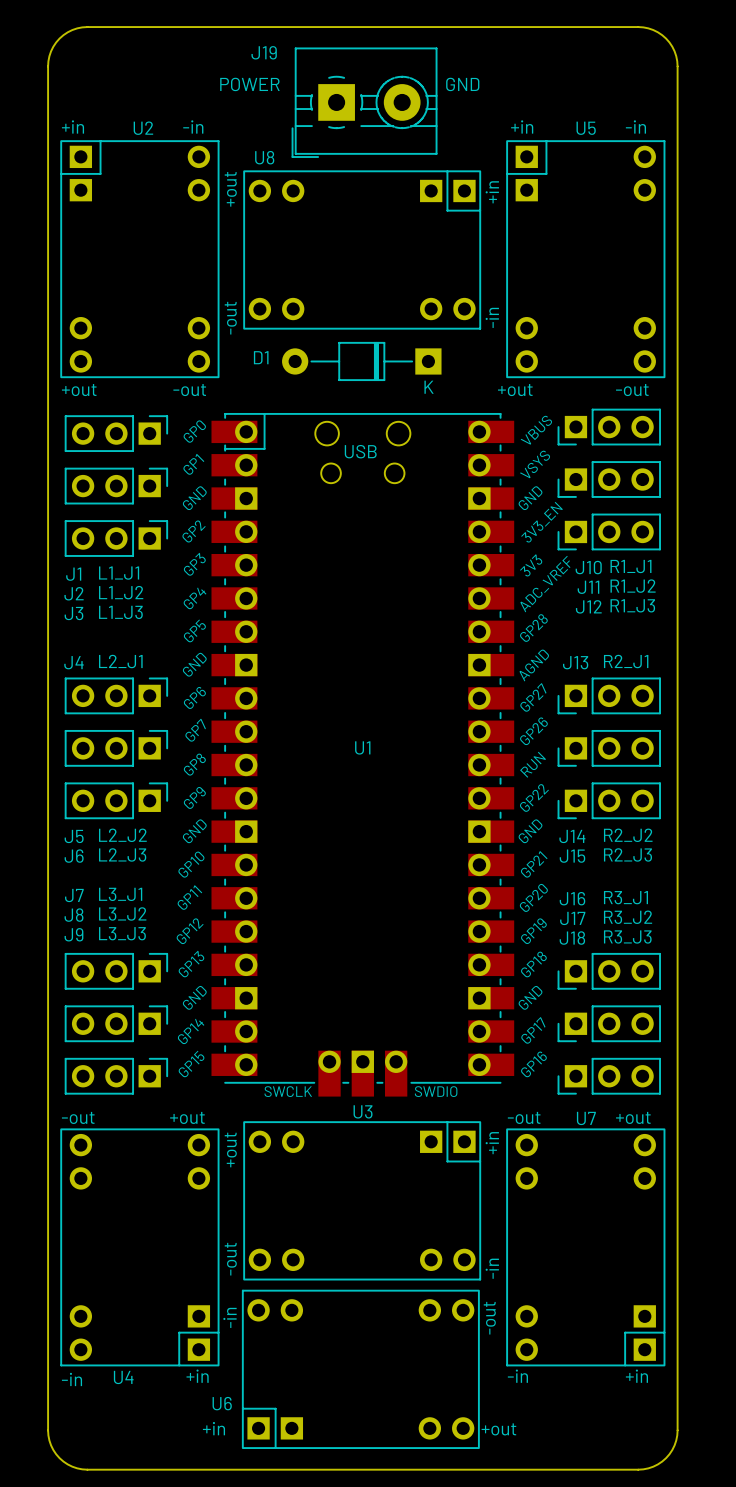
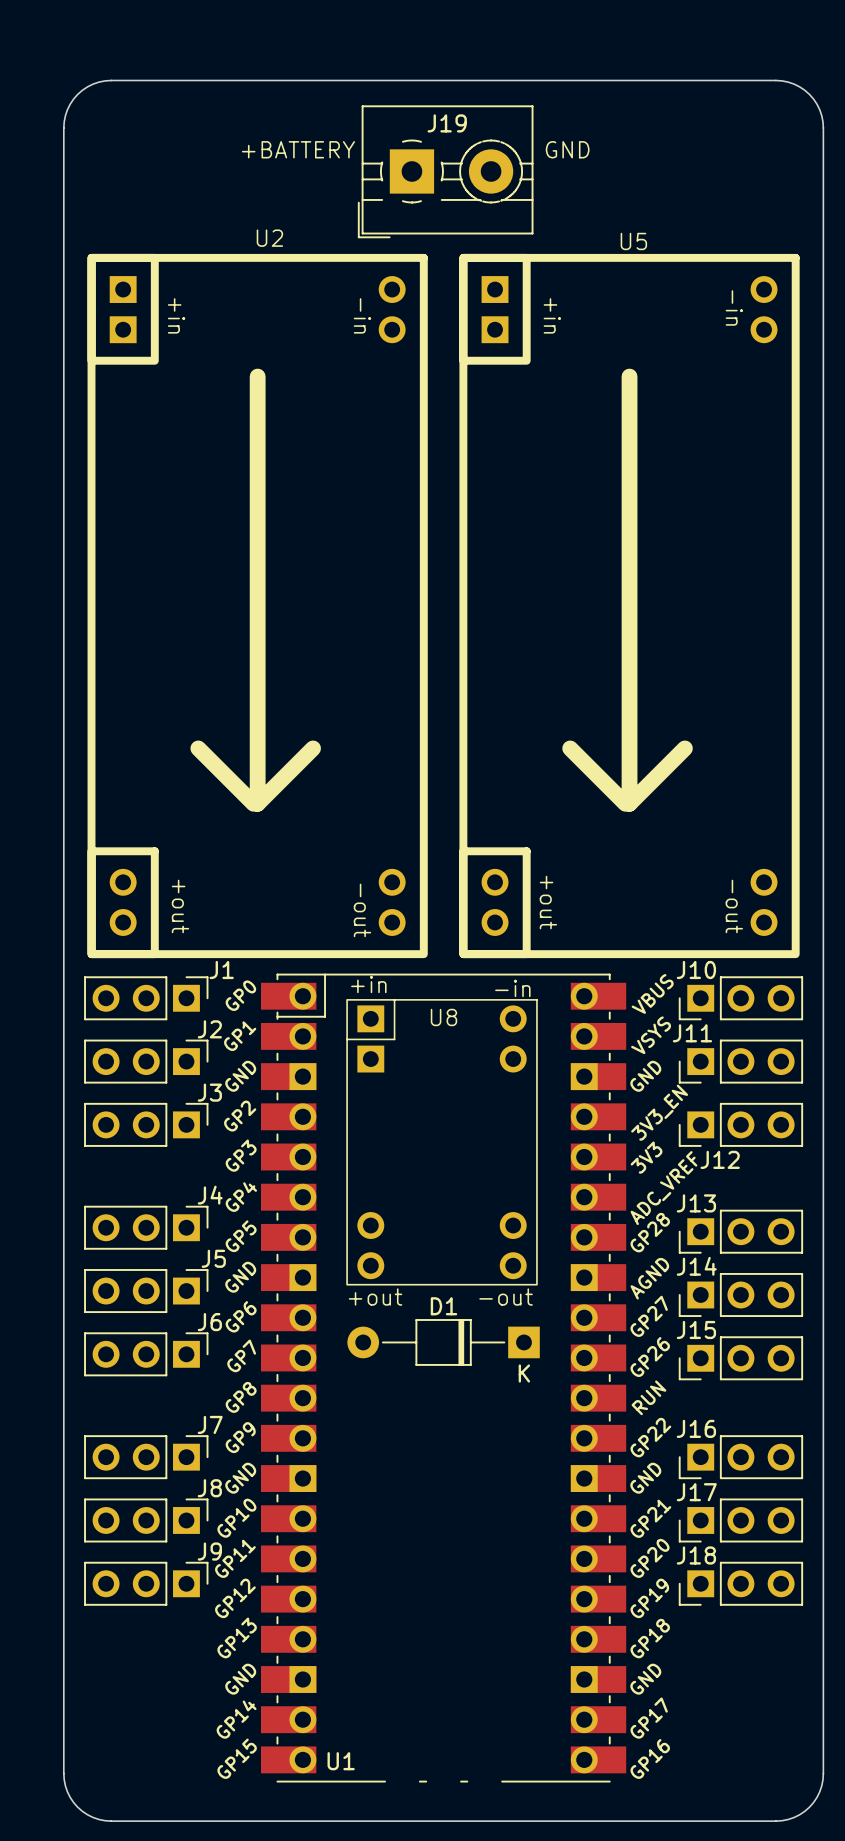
J19 name position: J19 (264, 52) -> J19 (447, 123)
text: none -> +BATTERY (298, 149)
text: POWER (249, 84) -> none
U2 name position: U2 (143, 128) -> U2 (269, 238)
U5 name position: U5 (586, 128) -> U5 (633, 241)
U2 footprint: [60, 140, 220, 378] -> [87, 253, 428, 959]
U5 footprint: [506, 140, 666, 378] -> [459, 253, 800, 959]
U8 name position: U8 (264, 157) -> U8 (443, 1017)
U8 footprint: [243, 170, 481, 330] -> [346, 999, 538, 1286]
D1 name position: D1 (261, 357) -> D1 (443, 1306)
D1 position: (361, 361) -> (443, 1342)
U1 footprint: [211, 413, 515, 1097] -> [260, 973, 627, 1783]
J10 position: (609, 427) -> (740, 998)
J1 position: (116, 433) -> (146, 998)
text: USB (360, 451) -> none
J11 position: (609, 479) -> (740, 1061)
J2 position: (116, 486) -> (146, 1061)
J12 position: (609, 531) -> (740, 1124)
J3 position: (116, 538) -> (146, 1124)
text: R1_J1 (630, 566) -> none
J10 name position: J10 (588, 567) -> J10 (696, 970)
text: L1_J1 (119, 573) -> none
J1 name position: J1 (73, 574) -> J1 (221, 970)
text: R1_J2 (633, 586) -> none
J11 name position: J11 (588, 587) -> J11 (692, 1033)
text: L1_J2 (121, 592) -> none
J2 name position: J2 (74, 593) -> J2 (209, 1029)
text: R1_J3 (632, 605) -> none
J12 name position: J12 (588, 606) -> J12 (720, 1159)
text: L1_J3 (120, 612) -> none
J3 name position: J3 (73, 613) -> J3 (209, 1092)
text: L2_J1 (120, 661) -> none
text: R2_J1 (626, 661) -> none
J4 name position: J4 (74, 662) -> J4 (210, 1195)
J13 name position: J13 (575, 662) -> J13 (696, 1203)
J4 position: (116, 695) -> (146, 1227)
J13 position: (609, 695) -> (740, 1231)
U1 name position: U1 (362, 747) -> U1 (341, 1761)
J5 position: (116, 748) -> (146, 1291)
J14 position: (609, 748) -> (740, 1294)
J6 position: (116, 800) -> (146, 1354)
J15 position: (609, 800) -> (740, 1358)
text: L2_J2 (122, 835) -> none
text: R2_J2 (628, 835) -> none
J5 name position: J5 (74, 836) -> J5 (213, 1258)
J14 name position: J14 (572, 836) -> J14 (696, 1266)
text: L2_J3 (122, 854) -> none
text: R2_J3 (627, 854) -> none
J6 name position: J6 (74, 856) -> J6 (209, 1322)
J15 name position: J15 (572, 856) -> J15 (696, 1330)
text: L3_J1 (120, 894) -> none
J7 name position: J7 (74, 895) -> J7 (210, 1424)
text: R3_J1 (625, 897) -> none
J16 name position: J16 (572, 898) -> J16 (696, 1428)
text: L3_J2 (122, 913) -> none
J8 name position: J8 (74, 915) -> J8 (209, 1488)
text: R3_J2 (628, 917) -> none
J17 name position: J17 (572, 918) -> J17 (696, 1492)
text: L3_J3 (122, 933) -> none
J9 name position: J9 (73, 934) -> J9 (209, 1551)
text: R3_J3 (627, 937) -> none
J18 name position: J18 (572, 938) -> J18 (696, 1555)
J7 position: (116, 971) -> (146, 1457)
J16 position: (609, 971) -> (740, 1457)
J8 position: (116, 1023) -> (146, 1520)
J17 position: (609, 1023) -> (740, 1520)
J9 position: (116, 1076) -> (146, 1583)
J18 position: (609, 1076) -> (740, 1583)
U3: (362, 1200) -> none
U4: (139, 1247) -> none
U7: (585, 1247) -> none
U6: (360, 1369) -> none

